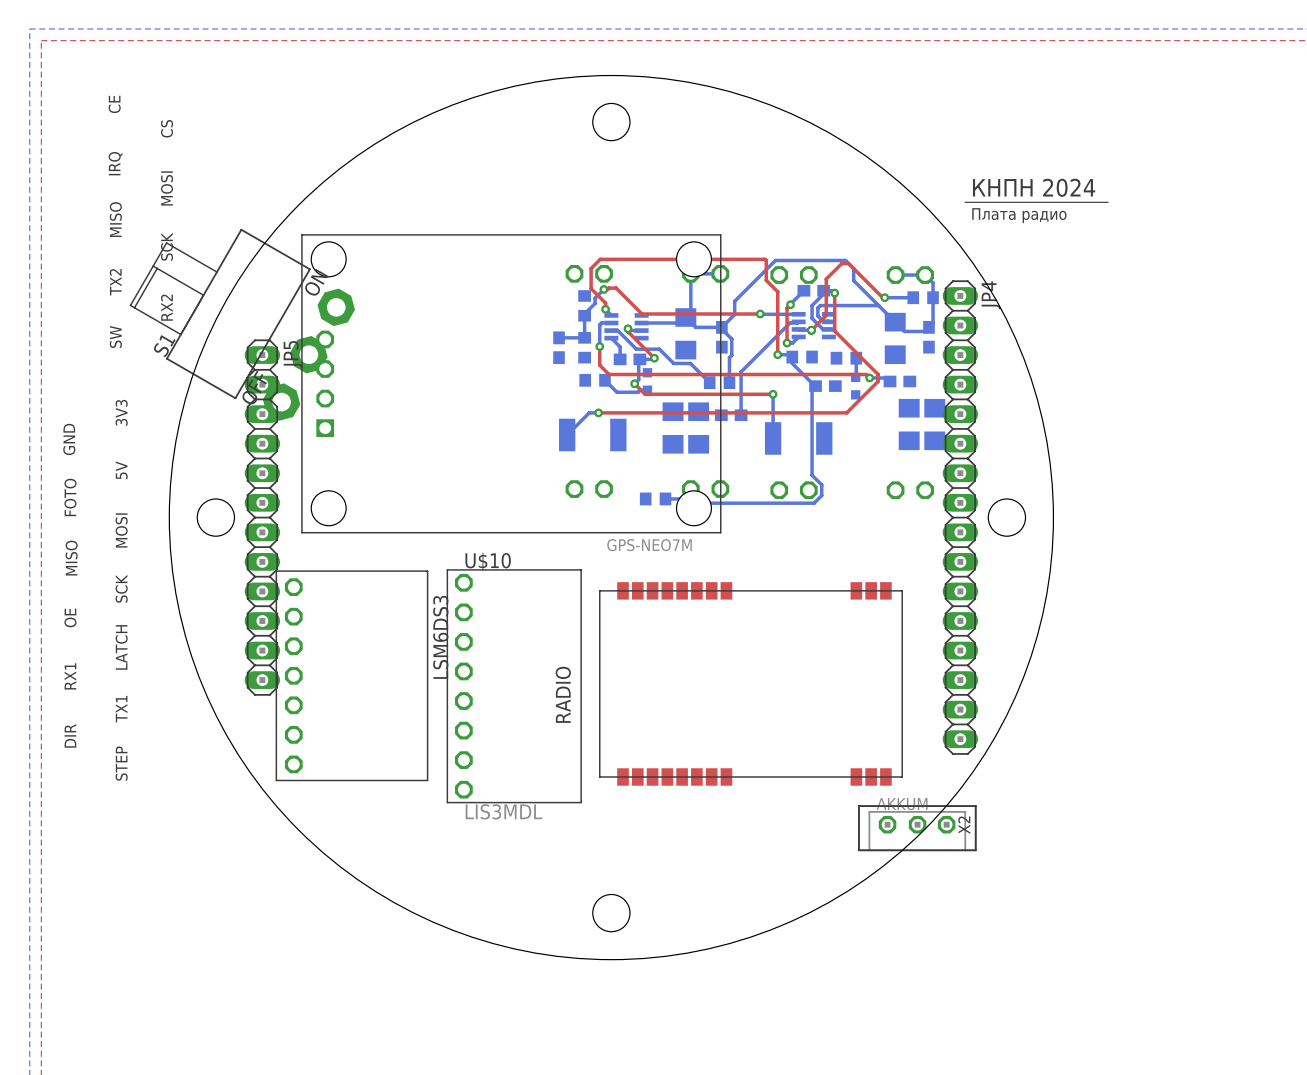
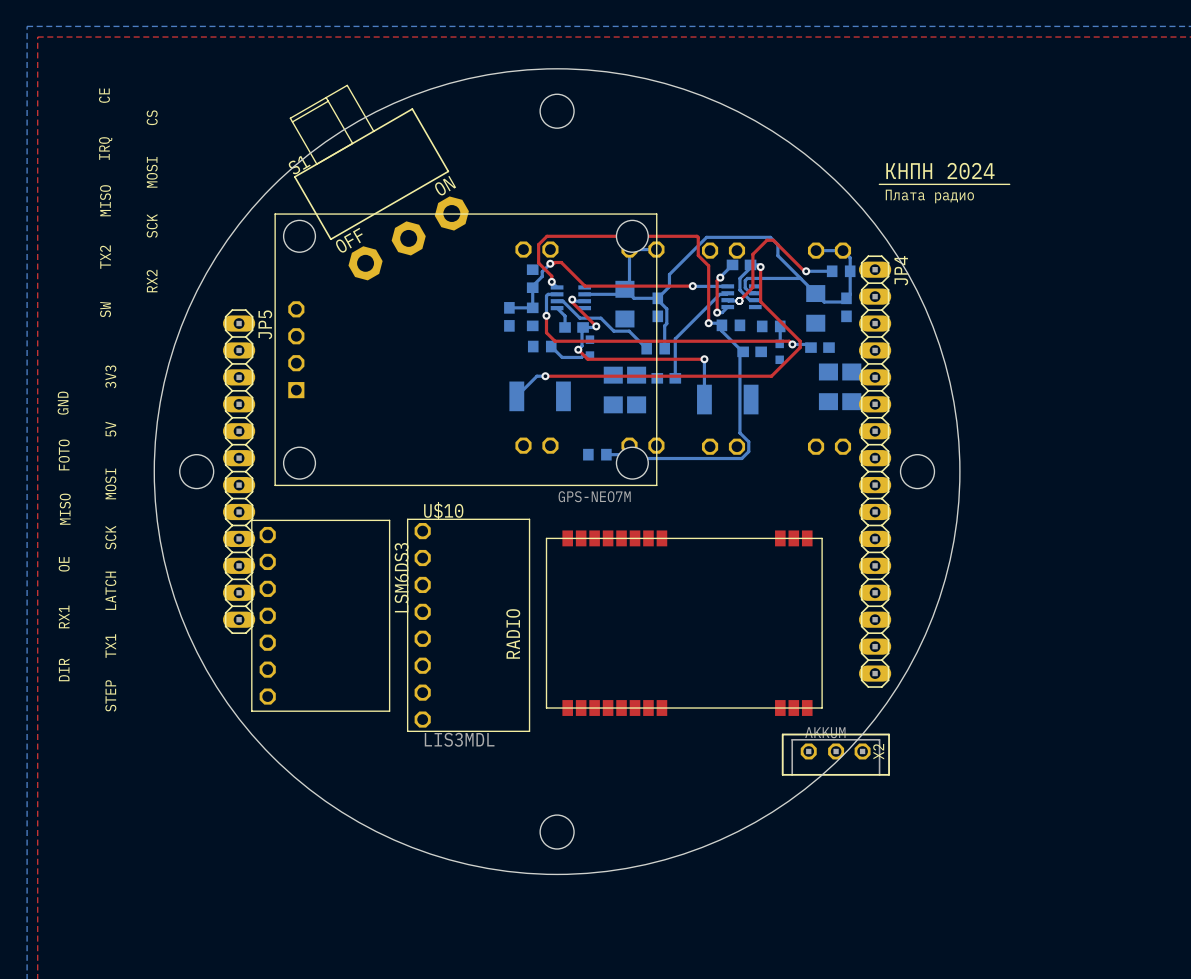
S1 rotation: 0° (242, 324) -> 30° clockwise (379, 182)
S1 position: (242, 324) -> (379, 182)

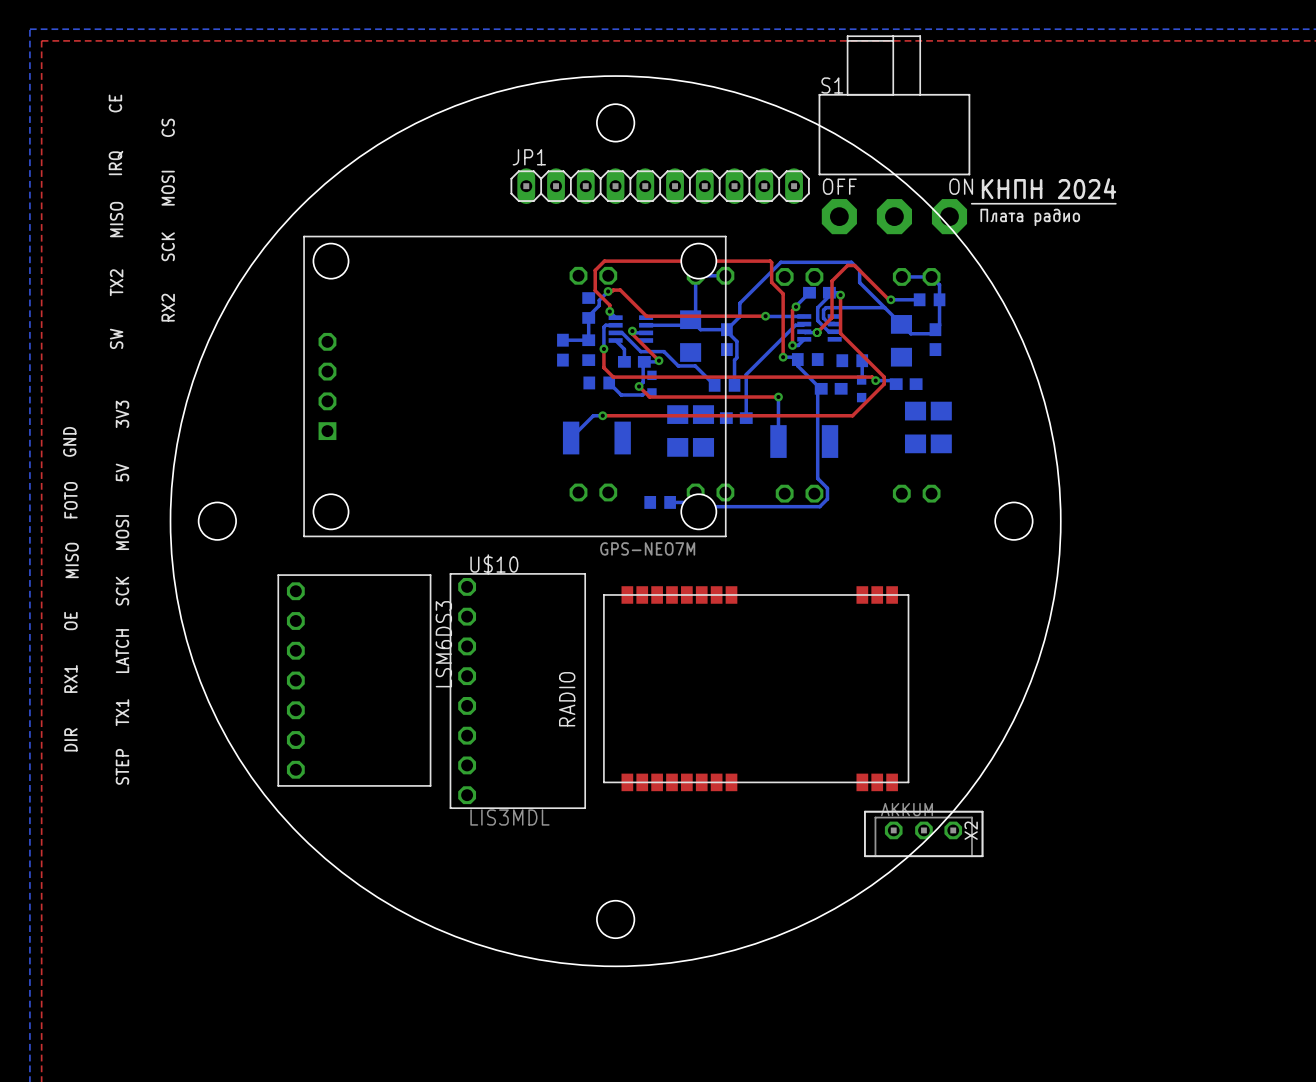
JP1: none -> (660, 186)
S1 rotation: 0° (379, 182) -> 30° clockwise (894, 134)
S1 position: (379, 182) -> (894, 134)
JP5: (239, 471) -> none
JP4: (875, 471) -> none

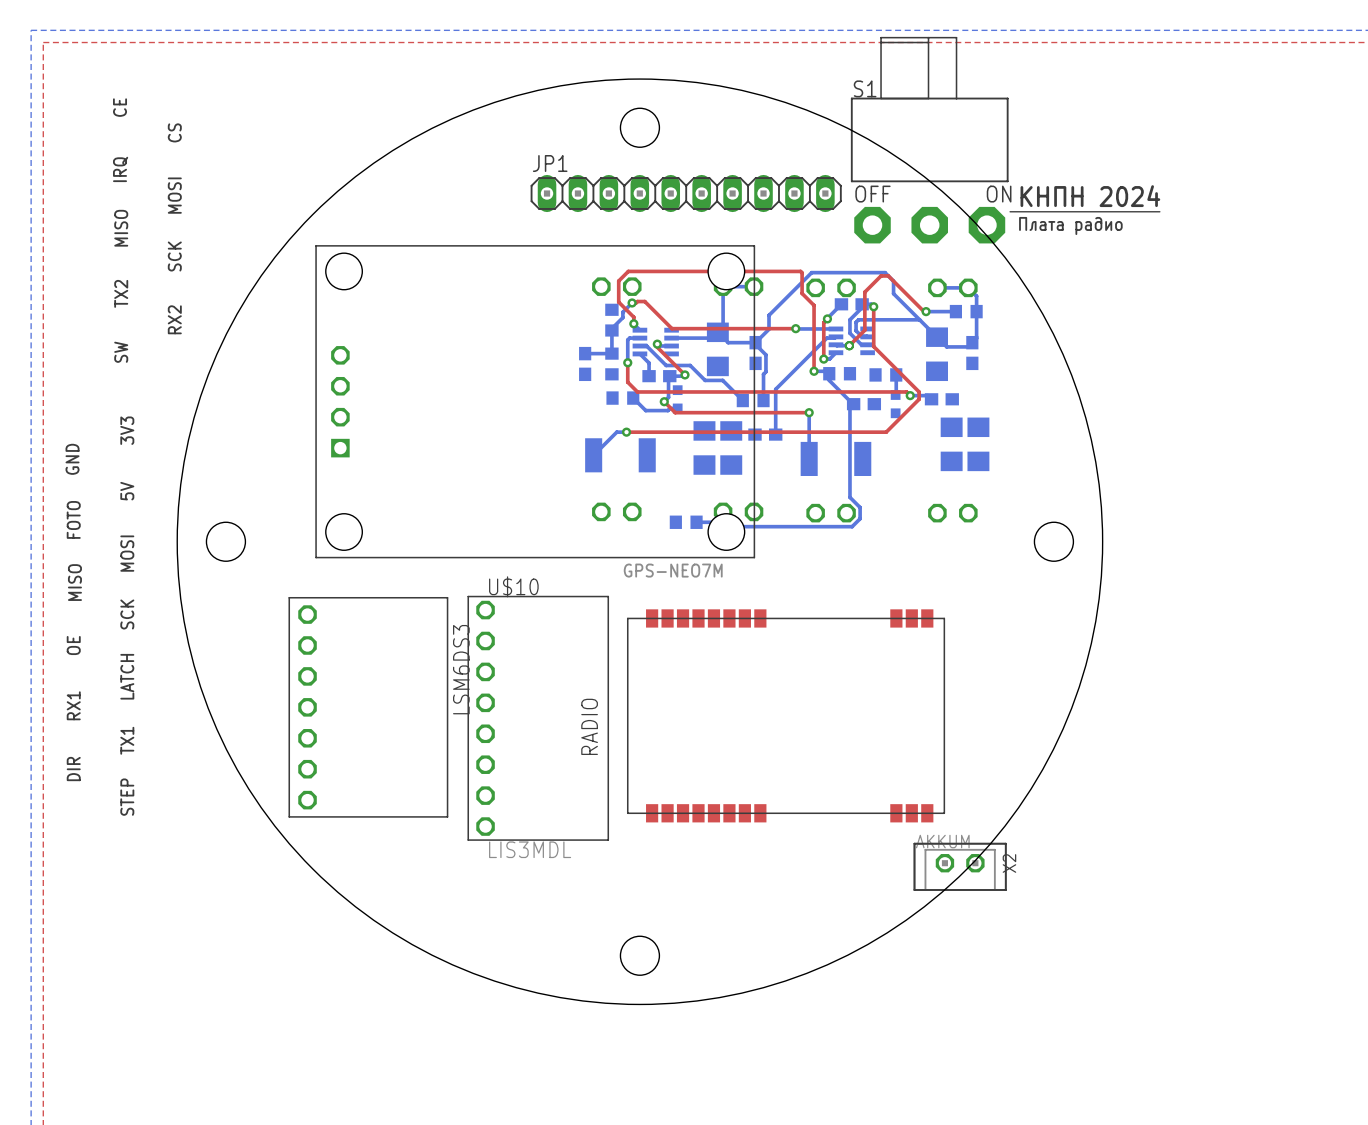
X2 footprint: [864, 810, 984, 858] -> [913, 842, 1007, 891]

